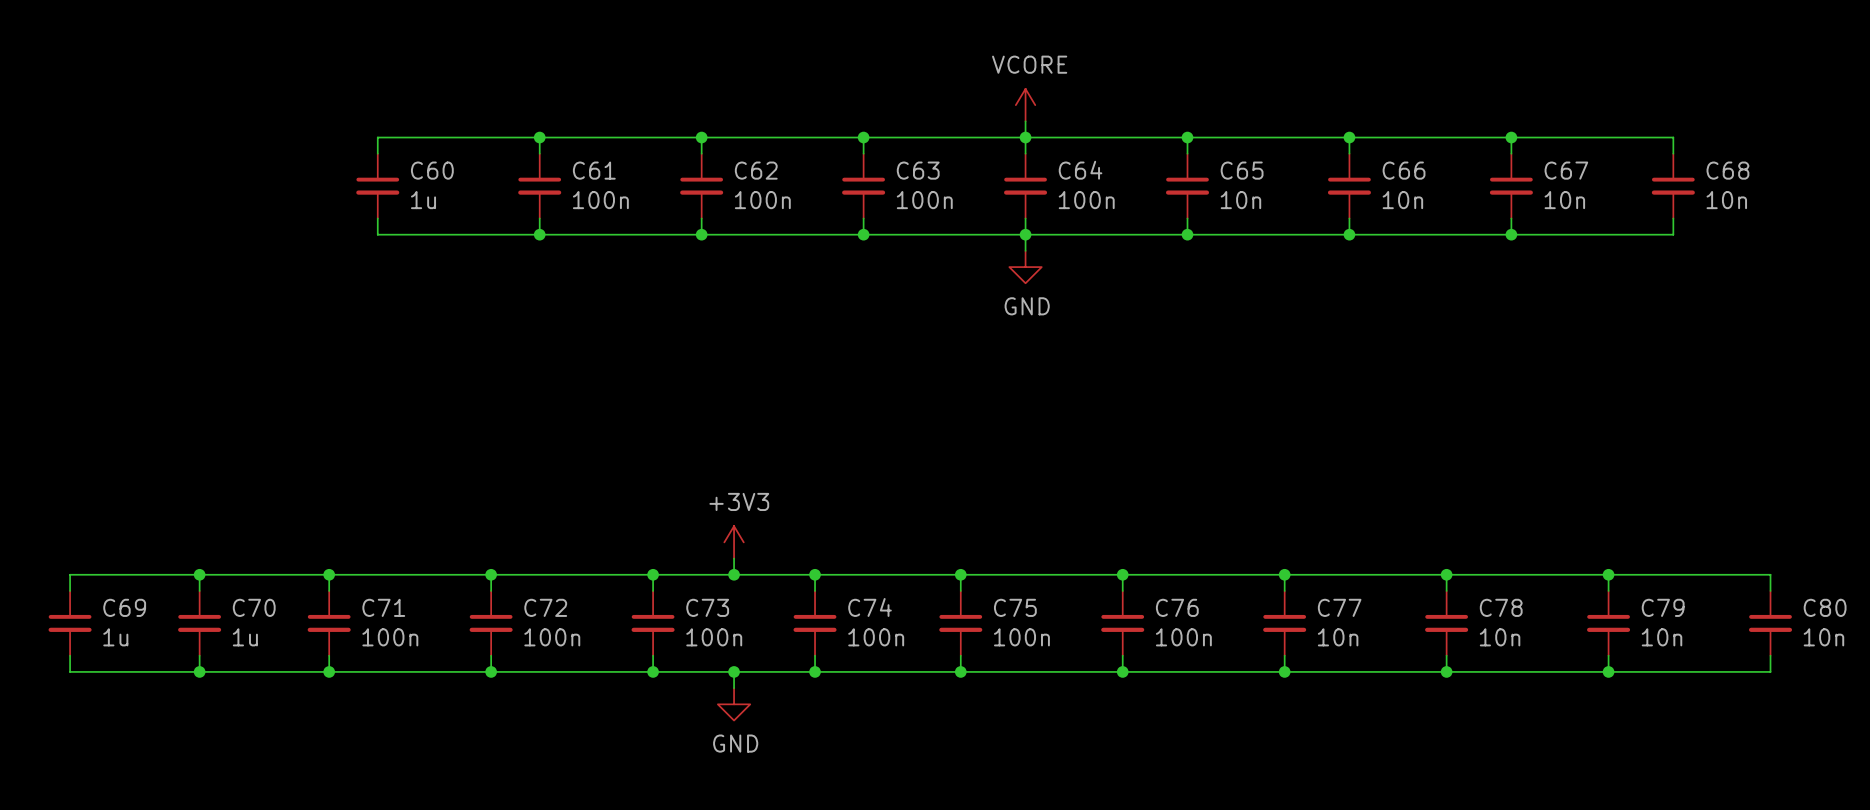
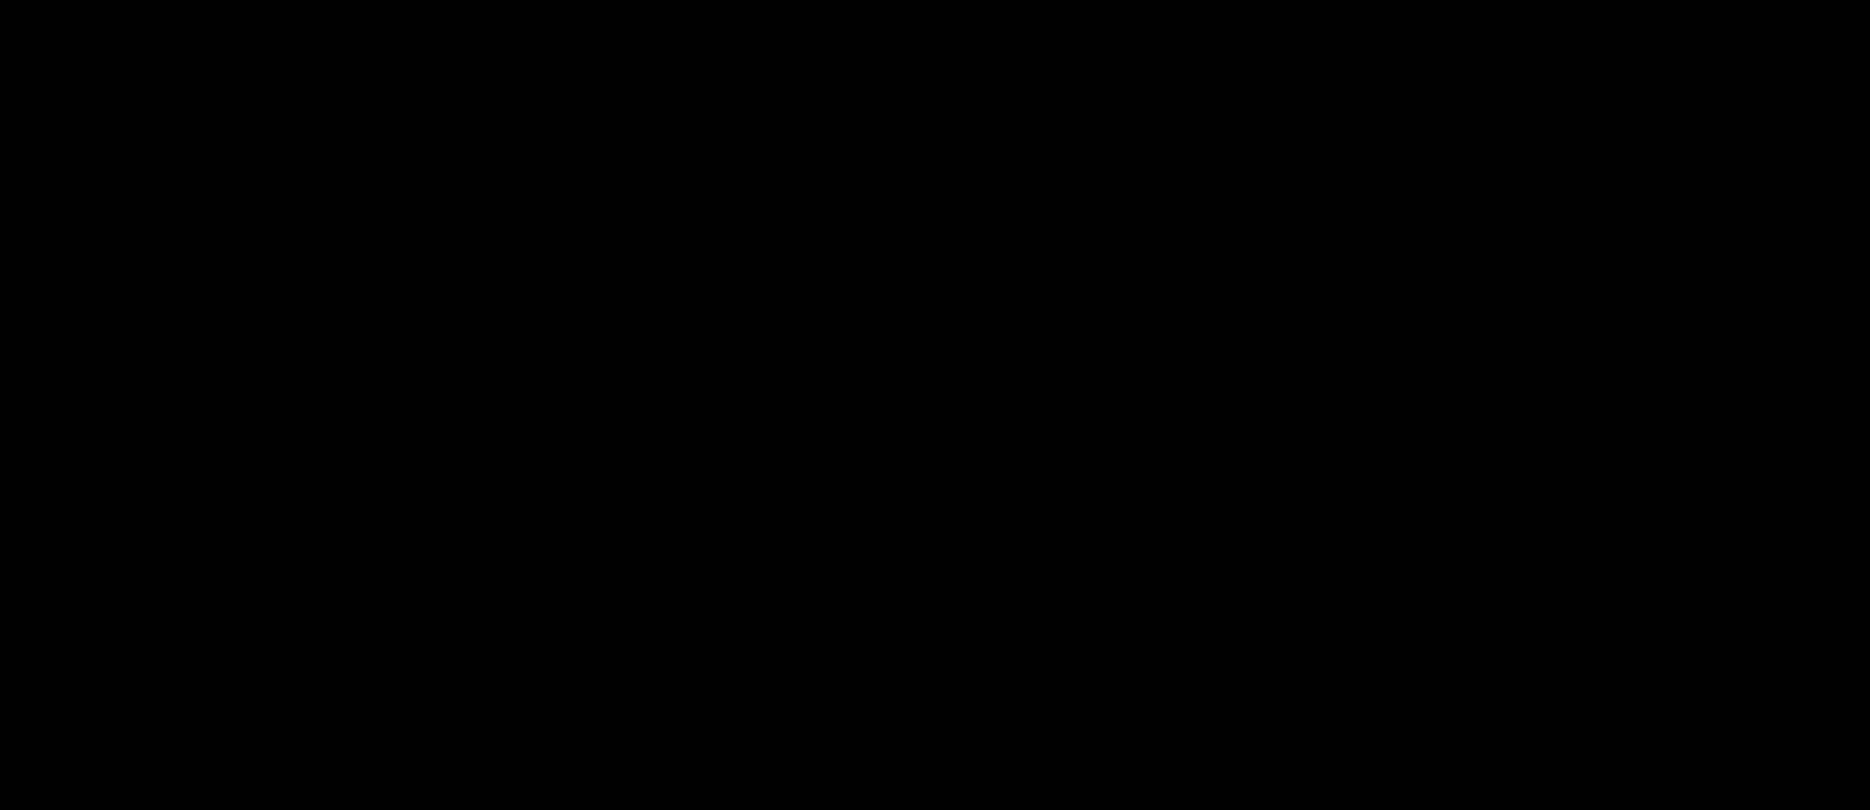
power symbol: VCORE (1025, 105) -> none
wire: (1025, 121) (1025, 153) -> none
wire: (539, 137) (539, 153) -> none
junction: (539, 137) -> none
wire: (701, 137) (701, 153) -> none
junction: (701, 137) -> none
wire: (863, 137) (863, 153) -> none
junction: (863, 137) -> none
junction: (1025, 137) -> none
wire: (1187, 137) (1187, 153) -> none
junction: (1187, 137) -> none
wire: (1349, 137) (1349, 153) -> none
junction: (1349, 137) -> none
wire: (1511, 137) (1511, 153) -> none
junction: (1511, 137) -> none
wire: (377, 153) (377, 137) (1673, 137) (1673, 153) -> none
C60: 1u (377, 186) -> none
C61: 100n (539, 186) -> none
C62: 100n (701, 186) -> none
C63: 100n (863, 186) -> none
C64: 100n (1025, 186) -> none
C65: 10n (1187, 186) -> none
C66: 10n (1349, 186) -> none
C67: 10n (1511, 186) -> none
C68: 10n (1673, 186) -> none
wire: (377, 218) (377, 234) (1673, 234) (1673, 218) -> none
wire: (539, 218) (539, 234) -> none
wire: (701, 218) (701, 234) -> none
wire: (863, 218) (863, 234) -> none
wire: (1025, 218) (1025, 250) -> none
wire: (1187, 218) (1187, 234) -> none
wire: (1349, 218) (1349, 234) -> none
wire: (1511, 218) (1511, 234) -> none
junction: (539, 234) -> none
junction: (701, 234) -> none
junction: (863, 234) -> none
junction: (1025, 234) -> none
junction: (1187, 234) -> none
junction: (1349, 234) -> none
junction: (1511, 234) -> none
power symbol: GND (1025, 267) -> none
power symbol: +3V3 (734, 542) -> none
wire: (734, 558) (734, 574) -> none
wire: (199, 574) (199, 590) -> none
junction: (199, 574) -> none
wire: (329, 574) (329, 590) -> none
junction: (329, 574) -> none
wire: (491, 574) (491, 590) -> none
junction: (491, 574) -> none
wire: (653, 574) (653, 590) -> none
junction: (653, 574) -> none
junction: (734, 574) -> none
wire: (815, 574) (815, 590) -> none
junction: (815, 574) -> none
wire: (960, 574) (960, 590) -> none
junction: (960, 574) -> none
wire: (1122, 574) (1122, 590) -> none
junction: (1122, 574) -> none
wire: (1284, 574) (1284, 590) -> none
junction: (1284, 574) -> none
wire: (1446, 574) (1446, 590) -> none
junction: (1446, 574) -> none
wire: (1608, 574) (1608, 590) -> none
junction: (1608, 574) -> none
wire: (70, 590) (70, 574) (1770, 574) (1770, 590) -> none
C69: 1u (70, 623) -> none
C70: 1u (199, 623) -> none
C71: 100n (329, 623) -> none
C72: 100n (491, 623) -> none
C73: 100n (653, 623) -> none
C74: 100n (815, 623) -> none
C75: 100n (960, 623) -> none
C76: 100n (1122, 623) -> none
C77: 10n (1284, 623) -> none
C78: 10n (1446, 623) -> none
C79: 10n (1608, 623) -> none
C80: 10n (1770, 623) -> none
wire: (70, 655) (70, 671) (1770, 671) (1770, 655) -> none
wire: (199, 655) (199, 671) -> none
wire: (329, 655) (329, 671) -> none
wire: (491, 655) (491, 671) -> none
wire: (653, 655) (653, 671) -> none
wire: (815, 655) (815, 671) -> none
wire: (960, 655) (960, 671) -> none
wire: (1122, 655) (1122, 671) -> none
wire: (1284, 655) (1284, 671) -> none
wire: (1446, 655) (1446, 671) -> none
wire: (1608, 655) (1608, 671) -> none
junction: (199, 671) -> none
junction: (329, 671) -> none
junction: (491, 671) -> none
junction: (653, 671) -> none
wire: (734, 671) (734, 688) -> none
junction: (734, 671) -> none
junction: (815, 671) -> none
junction: (960, 671) -> none
junction: (1122, 671) -> none
junction: (1284, 671) -> none
junction: (1446, 671) -> none
junction: (1608, 671) -> none
power symbol: GND (734, 704) -> none

